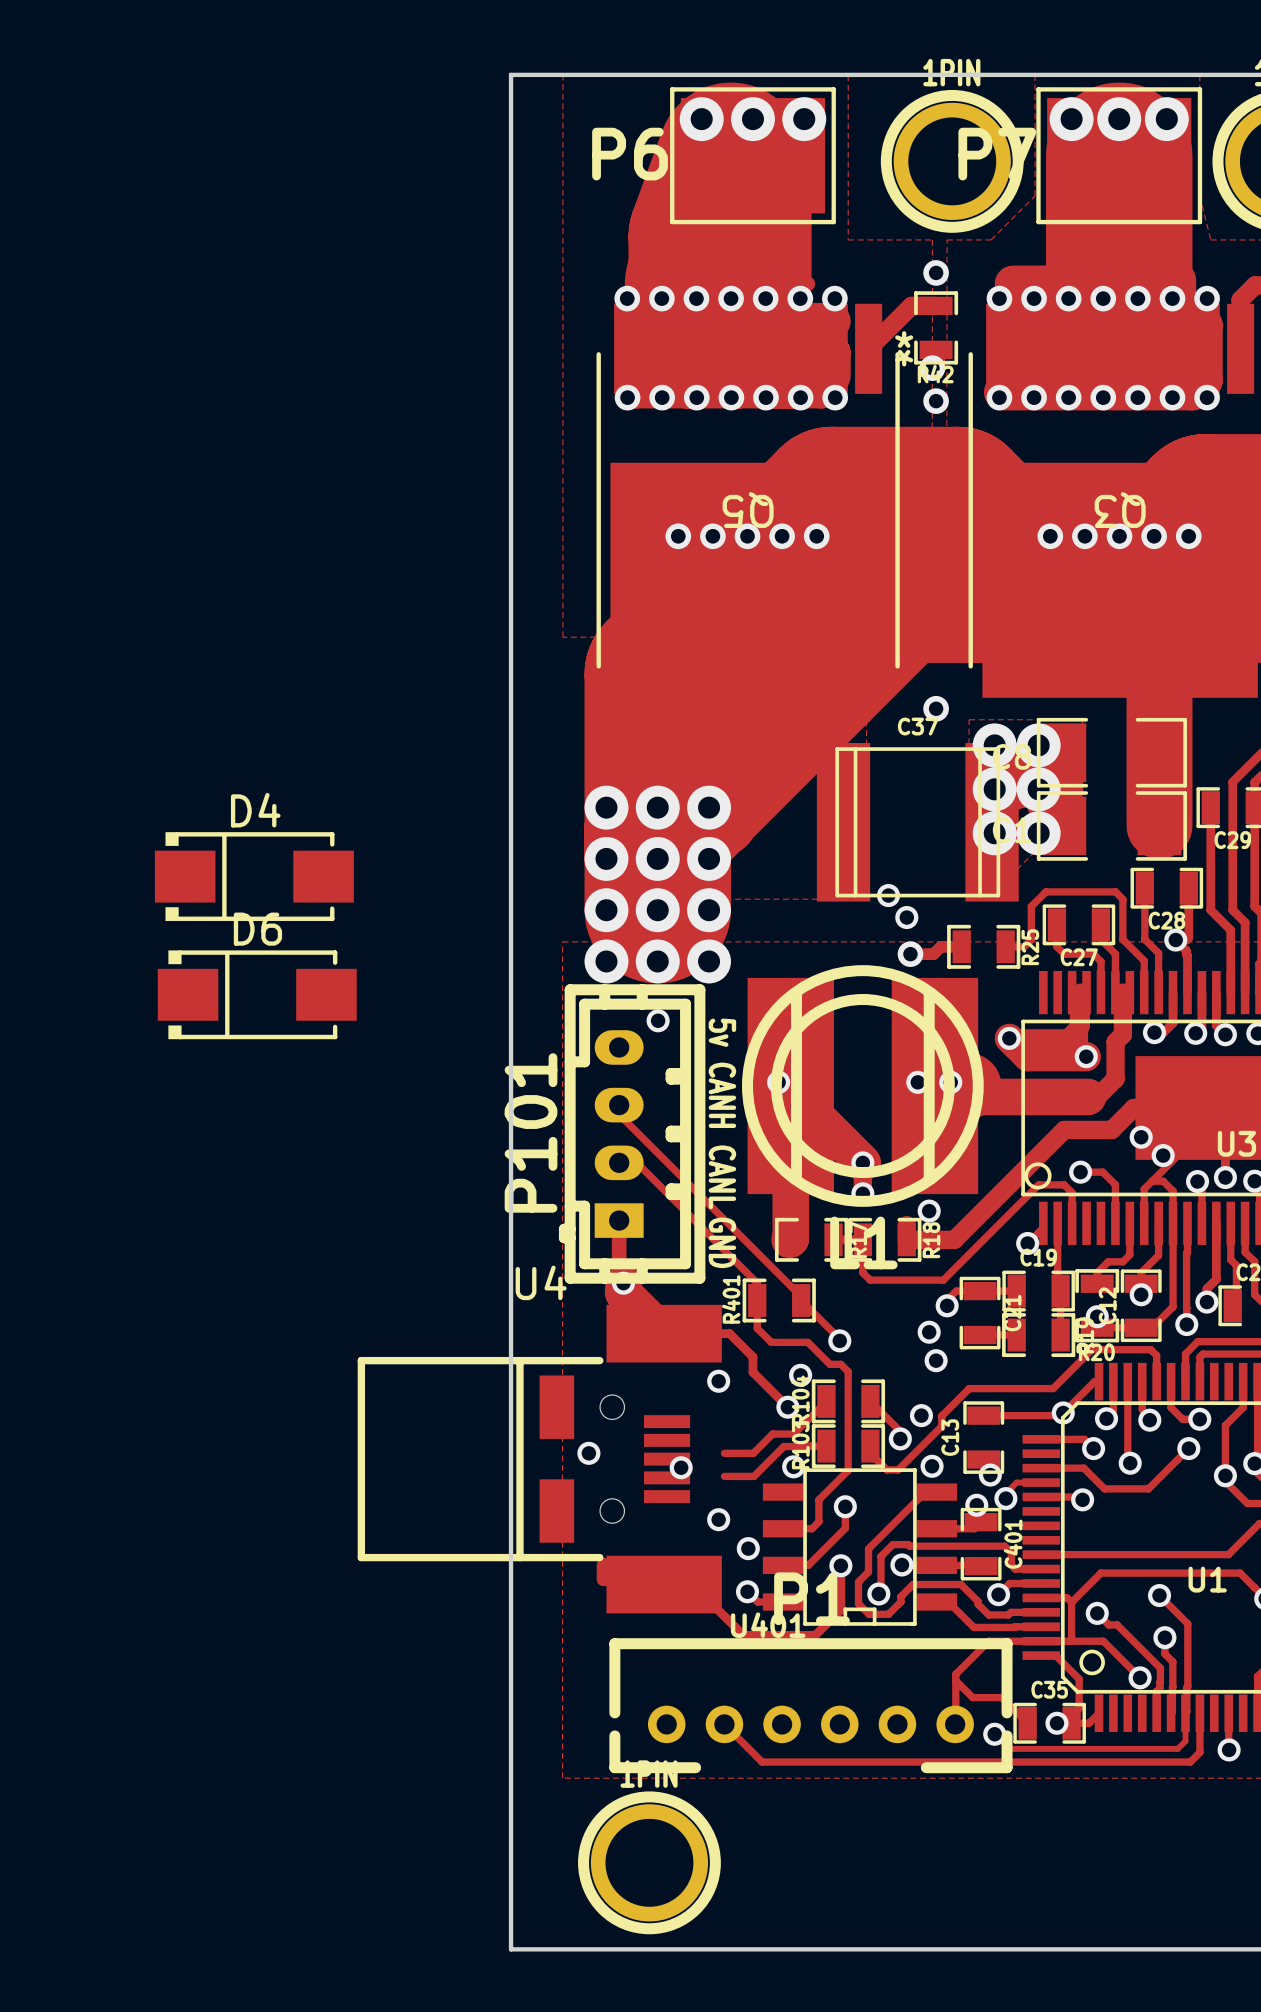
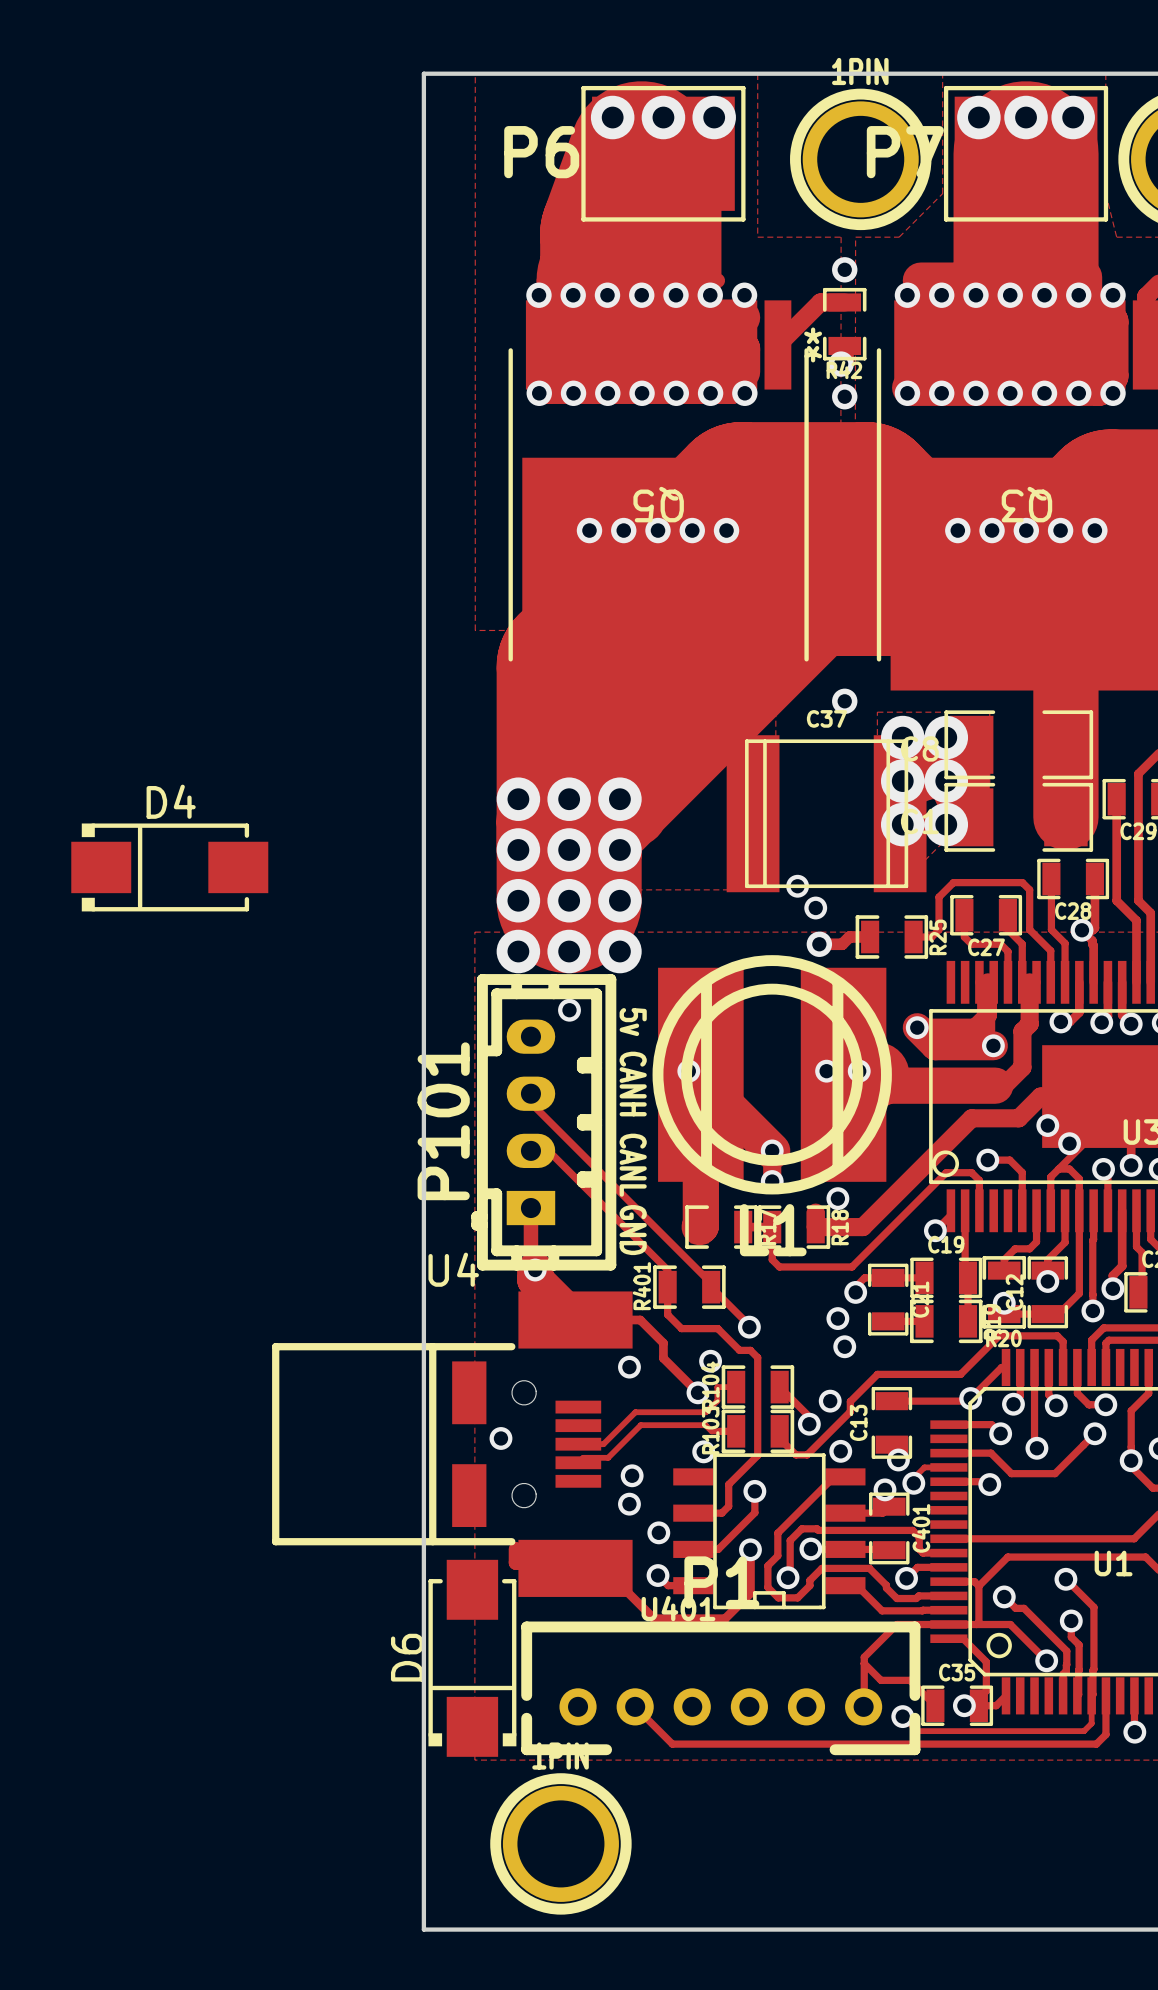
D6 rotation: 0° (257, 994) -> 90° counterclockwise (472, 1658)
D6 position: (257, 994) -> (472, 1658)
track: (826, 1401) (793, 1434) (772, 1434) (753, 1453) (724, 1453) -> (736, 1387) (717, 1387) (717, 1400) (706, 1412) (635, 1412) (603, 1444) (578, 1444)
track: (809, 1446) (783, 1446) (753, 1476) (724, 1476) -> (719, 1431) (711, 1431) (705, 1425) (640, 1425) (608, 1457) (583, 1457) (578, 1462)
via position: (681, 1467) -> (632, 1475)

